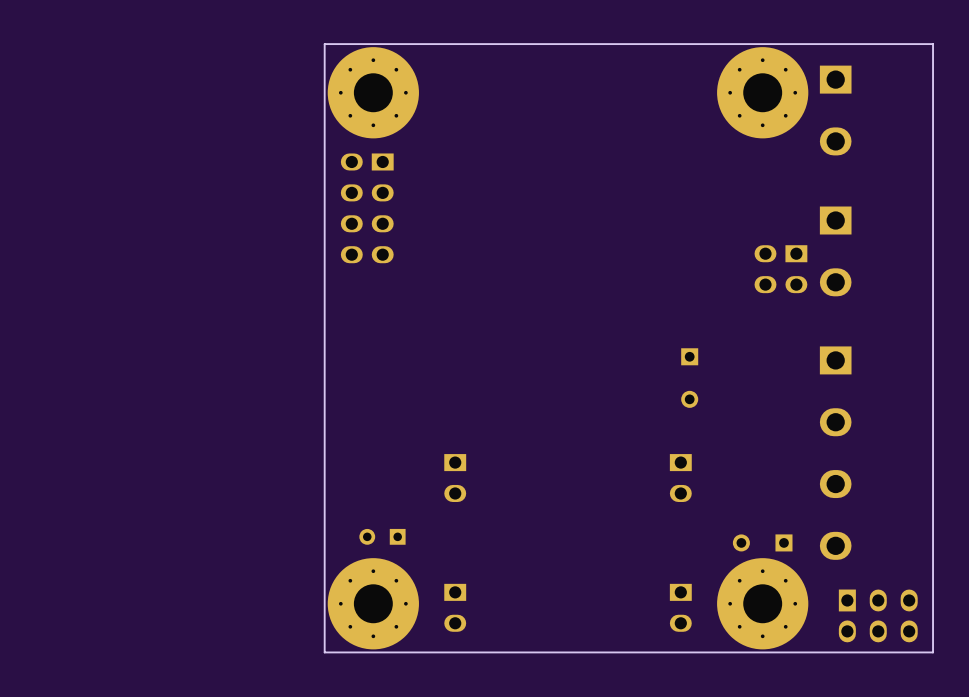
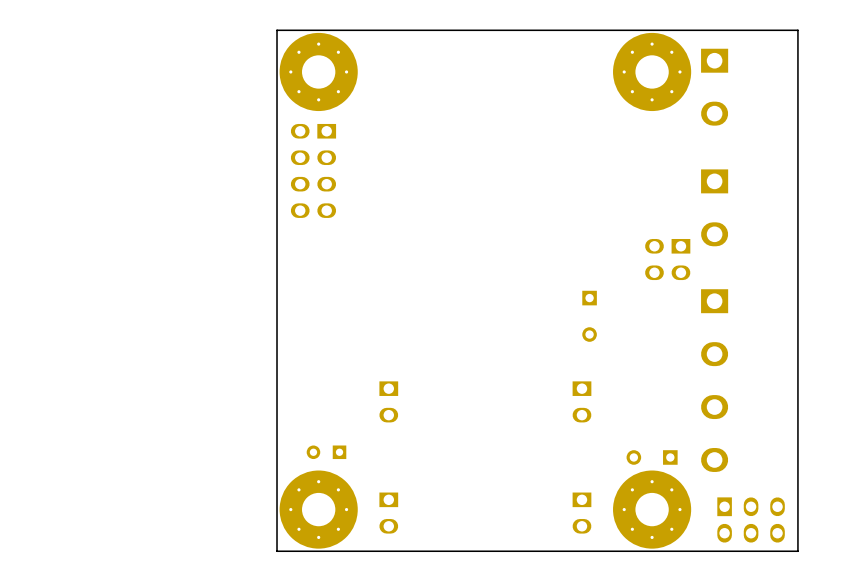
part position: (780, 269) -> (667, 259)

